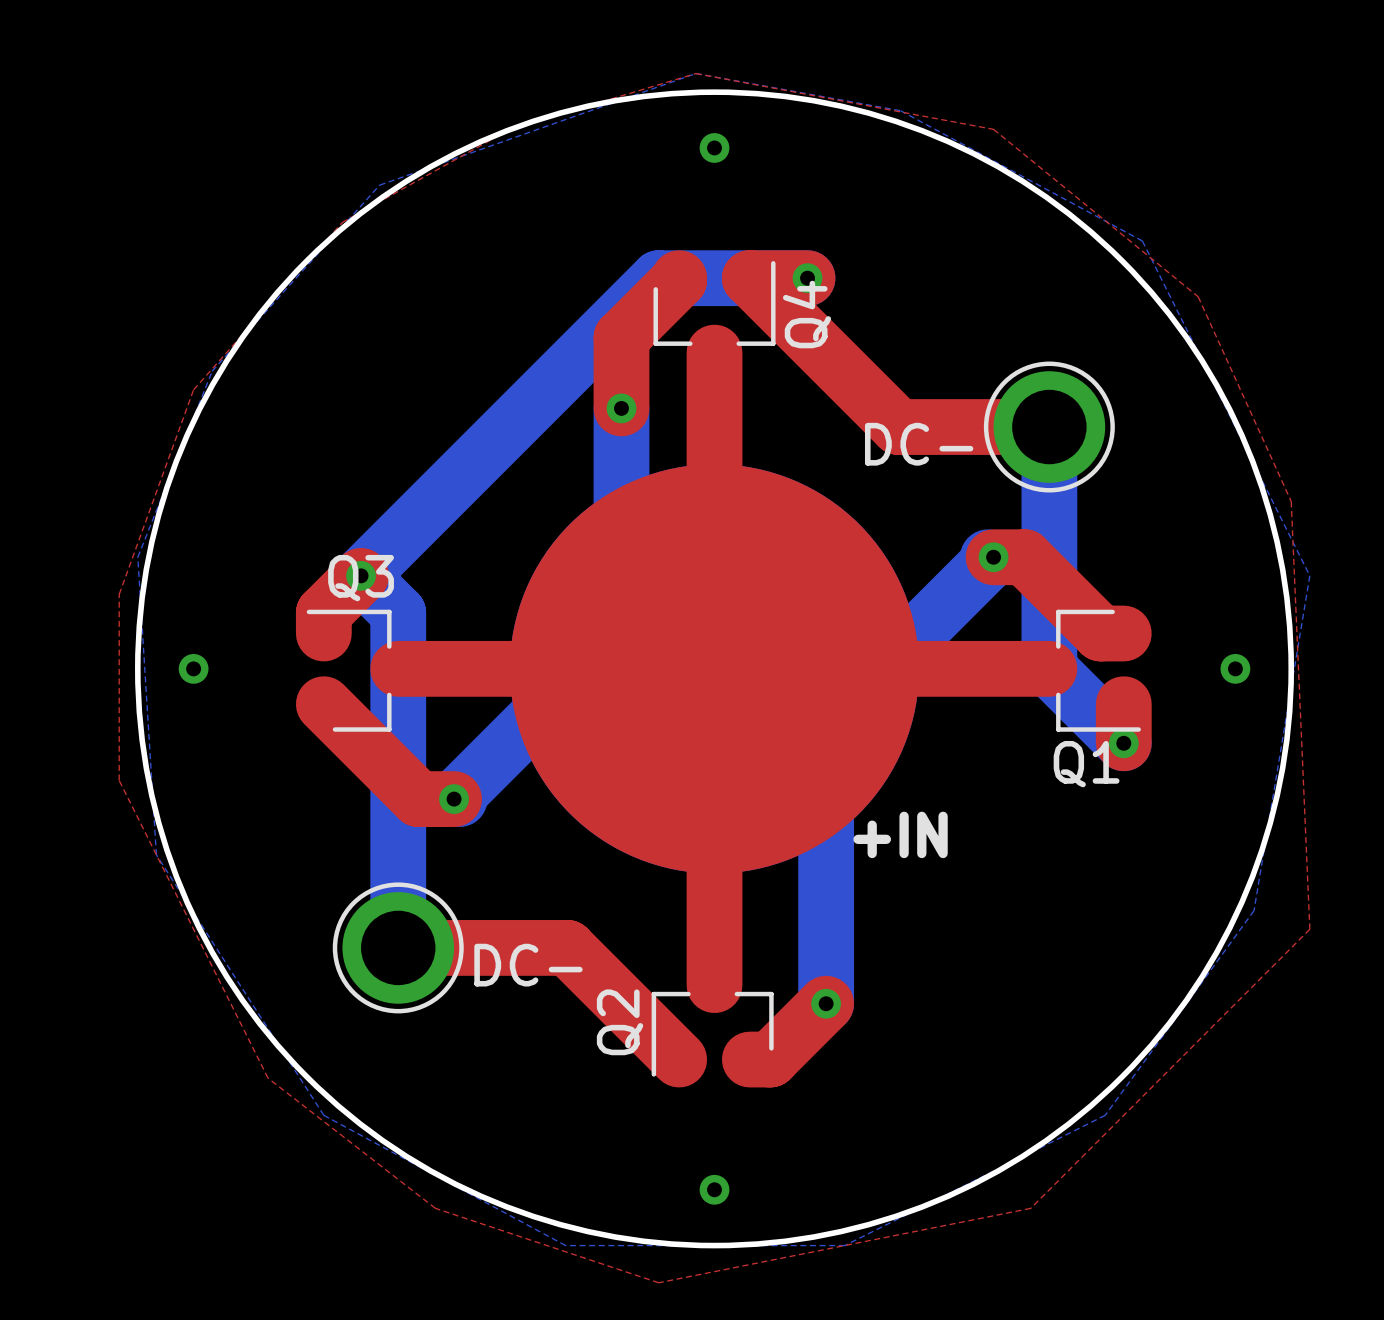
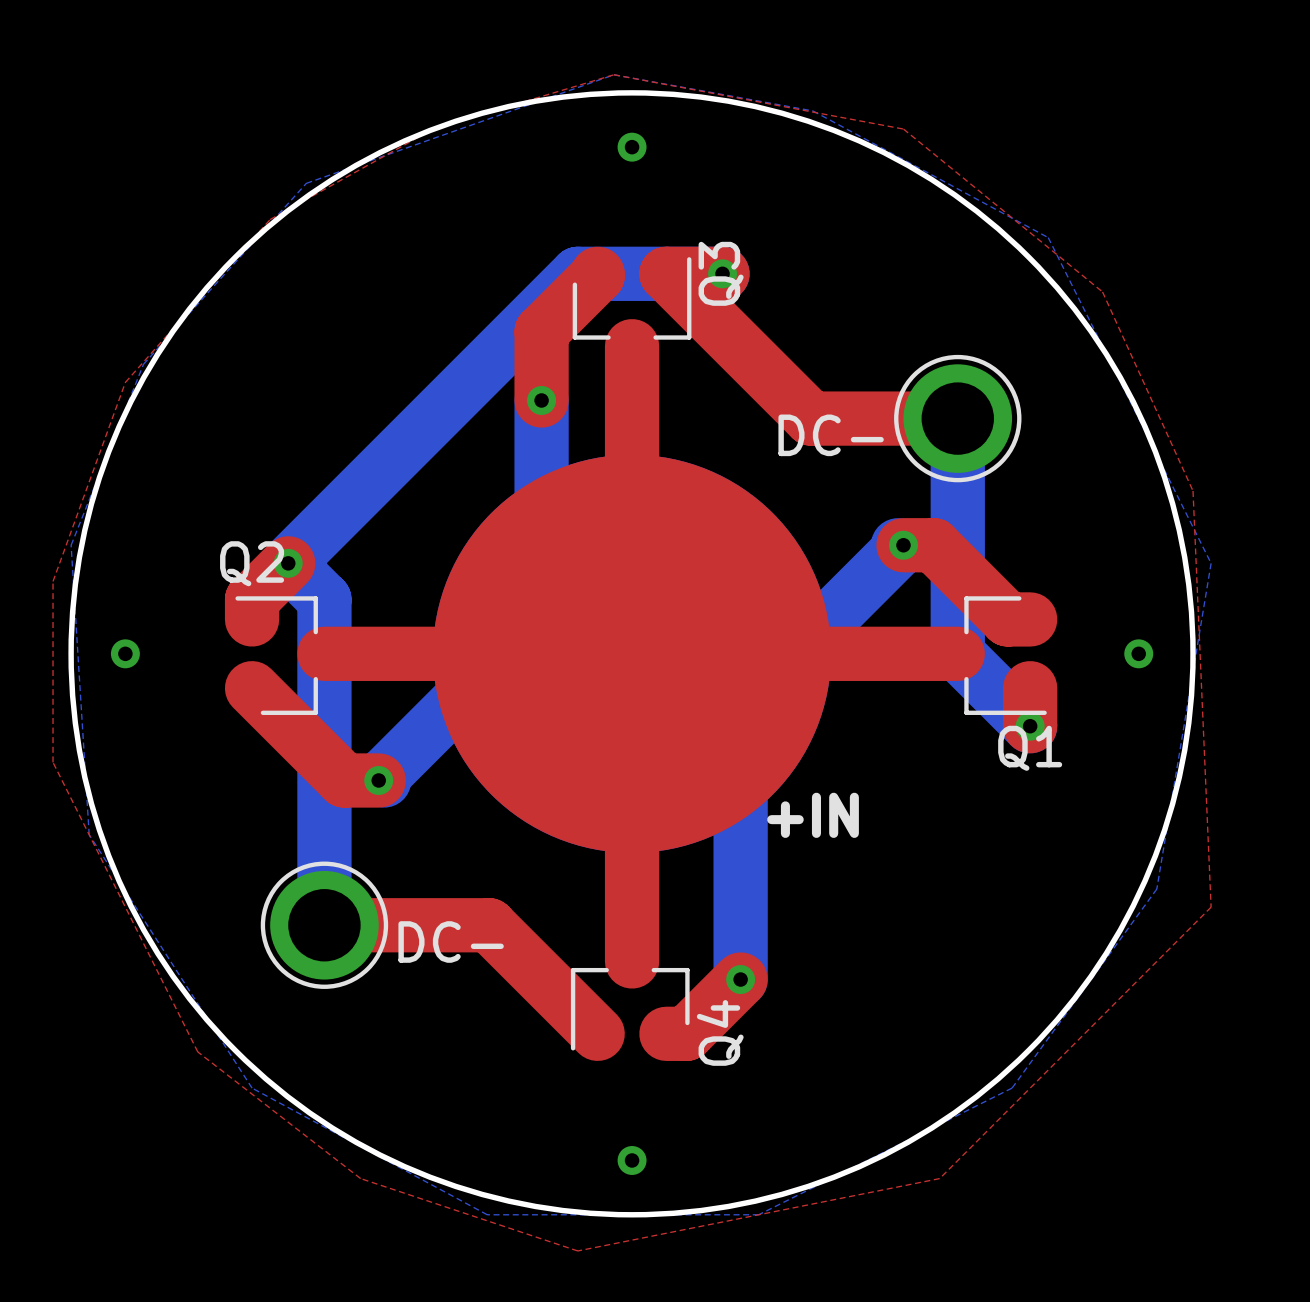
Q4 name: Q4 (807, 314) -> Q3 (721, 273)
Q3 name: Q3 (361, 578) -> Q2 (252, 563)
Q1 name position: Q1 (1086, 764) -> Q1 (1030, 748)
Q2 name: Q2 (620, 1022) -> Q4 (720, 1032)

